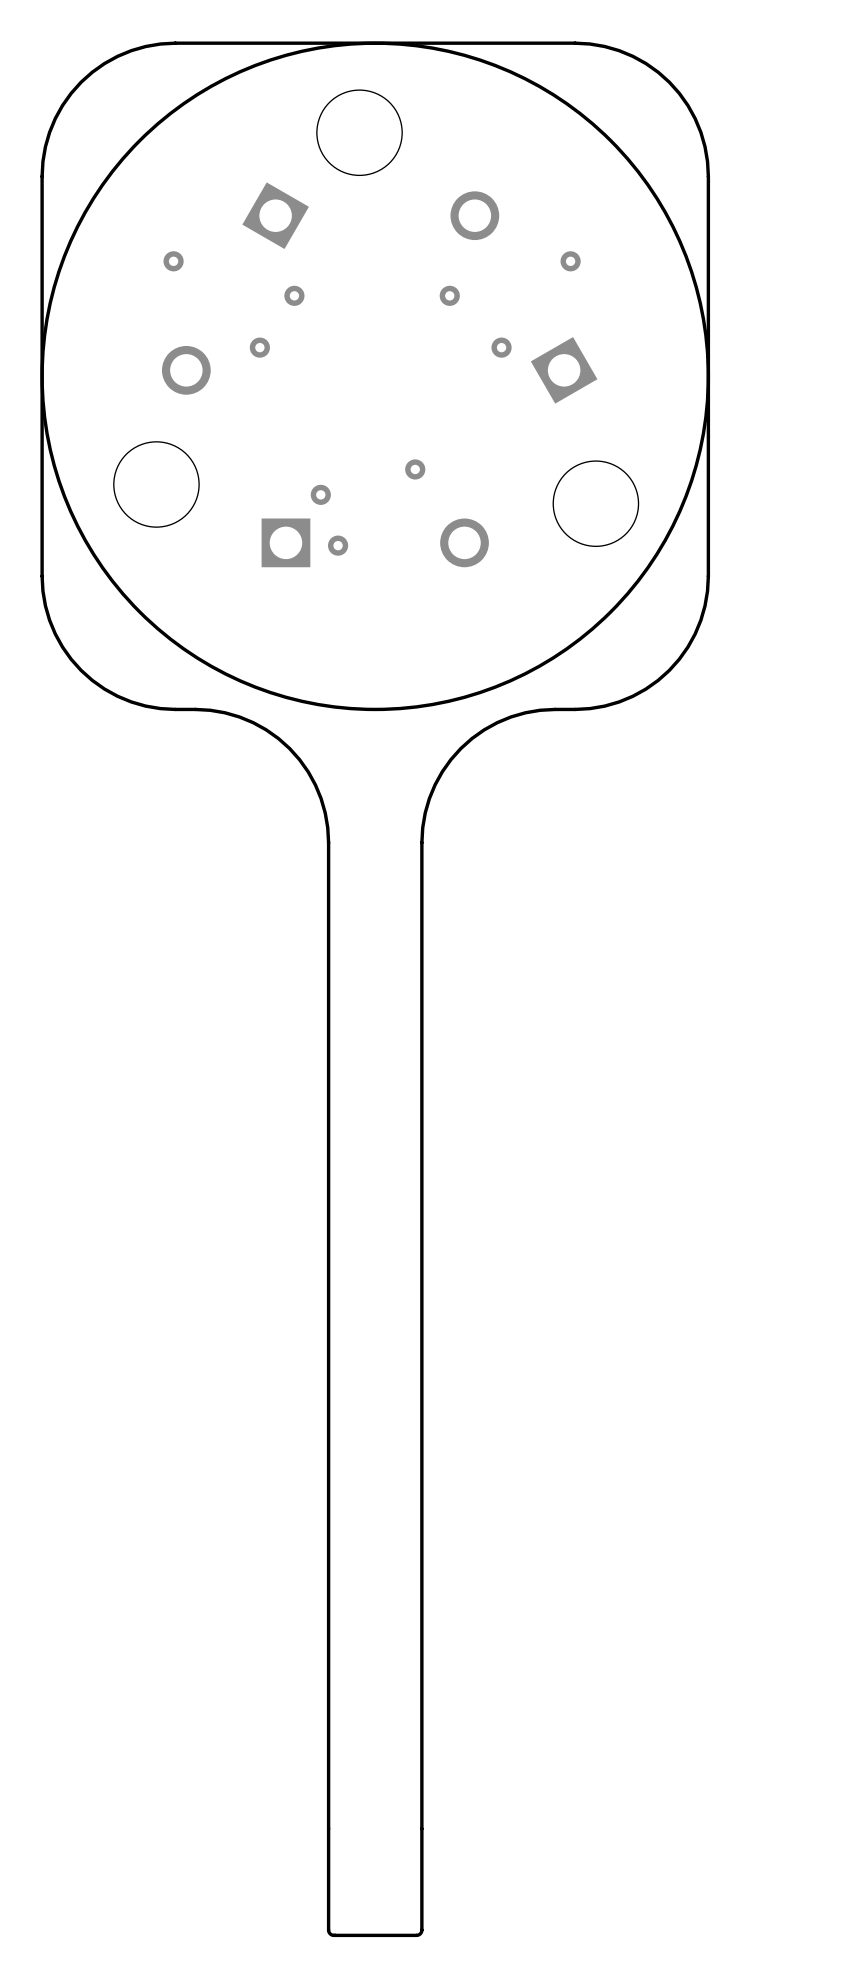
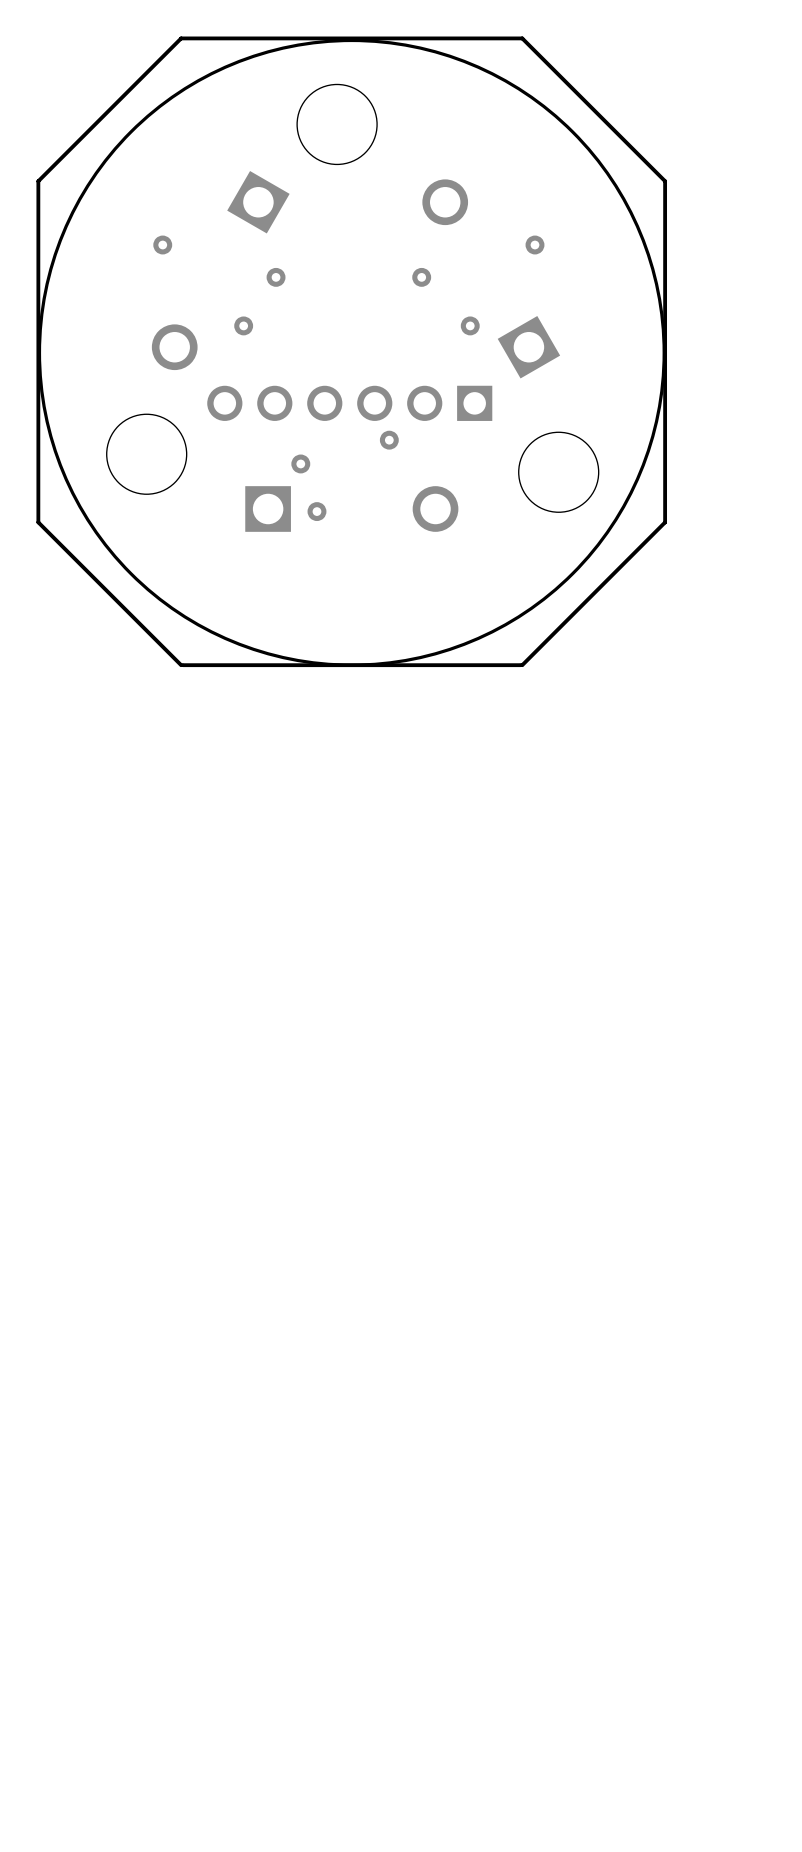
part: none -> (349, 403)
board edge: (195, 709) (210, 710) (239, 716) (266, 729) (278, 738) (299, 759) (308, 771) (321, 798) (327, 827) (328, 1828) -> none
board edge: (555, 709) (540, 710) (511, 716) (484, 729) (472, 738) (450, 759) (442, 771) (429, 798) (422, 827) (421, 1828) -> (520, 665) (183, 665)
board edge: (557, 709) (604, 706) (632, 696) (658, 680) (679, 659) (695, 634) (705, 605) (708, 576) (708, 176) (705, 146) (700, 132) (687, 105) (679, 93) (658, 72) (646, 63) (619, 50) (590, 44) (575, 43) (160, 44) (131, 50) (104, 63) (81, 82) (62, 105) (49, 132) (42, 161) (42, 176) (42, 576) (45, 605) (49, 620) (62, 647) (81, 670) (104, 689) (131, 701) (145, 706) (193, 709) -> (522, 665) (665, 522) (665, 181) (522, 38) (181, 38) (38, 181) (38, 522) (181, 665)
part: (375, 1882) -> none

